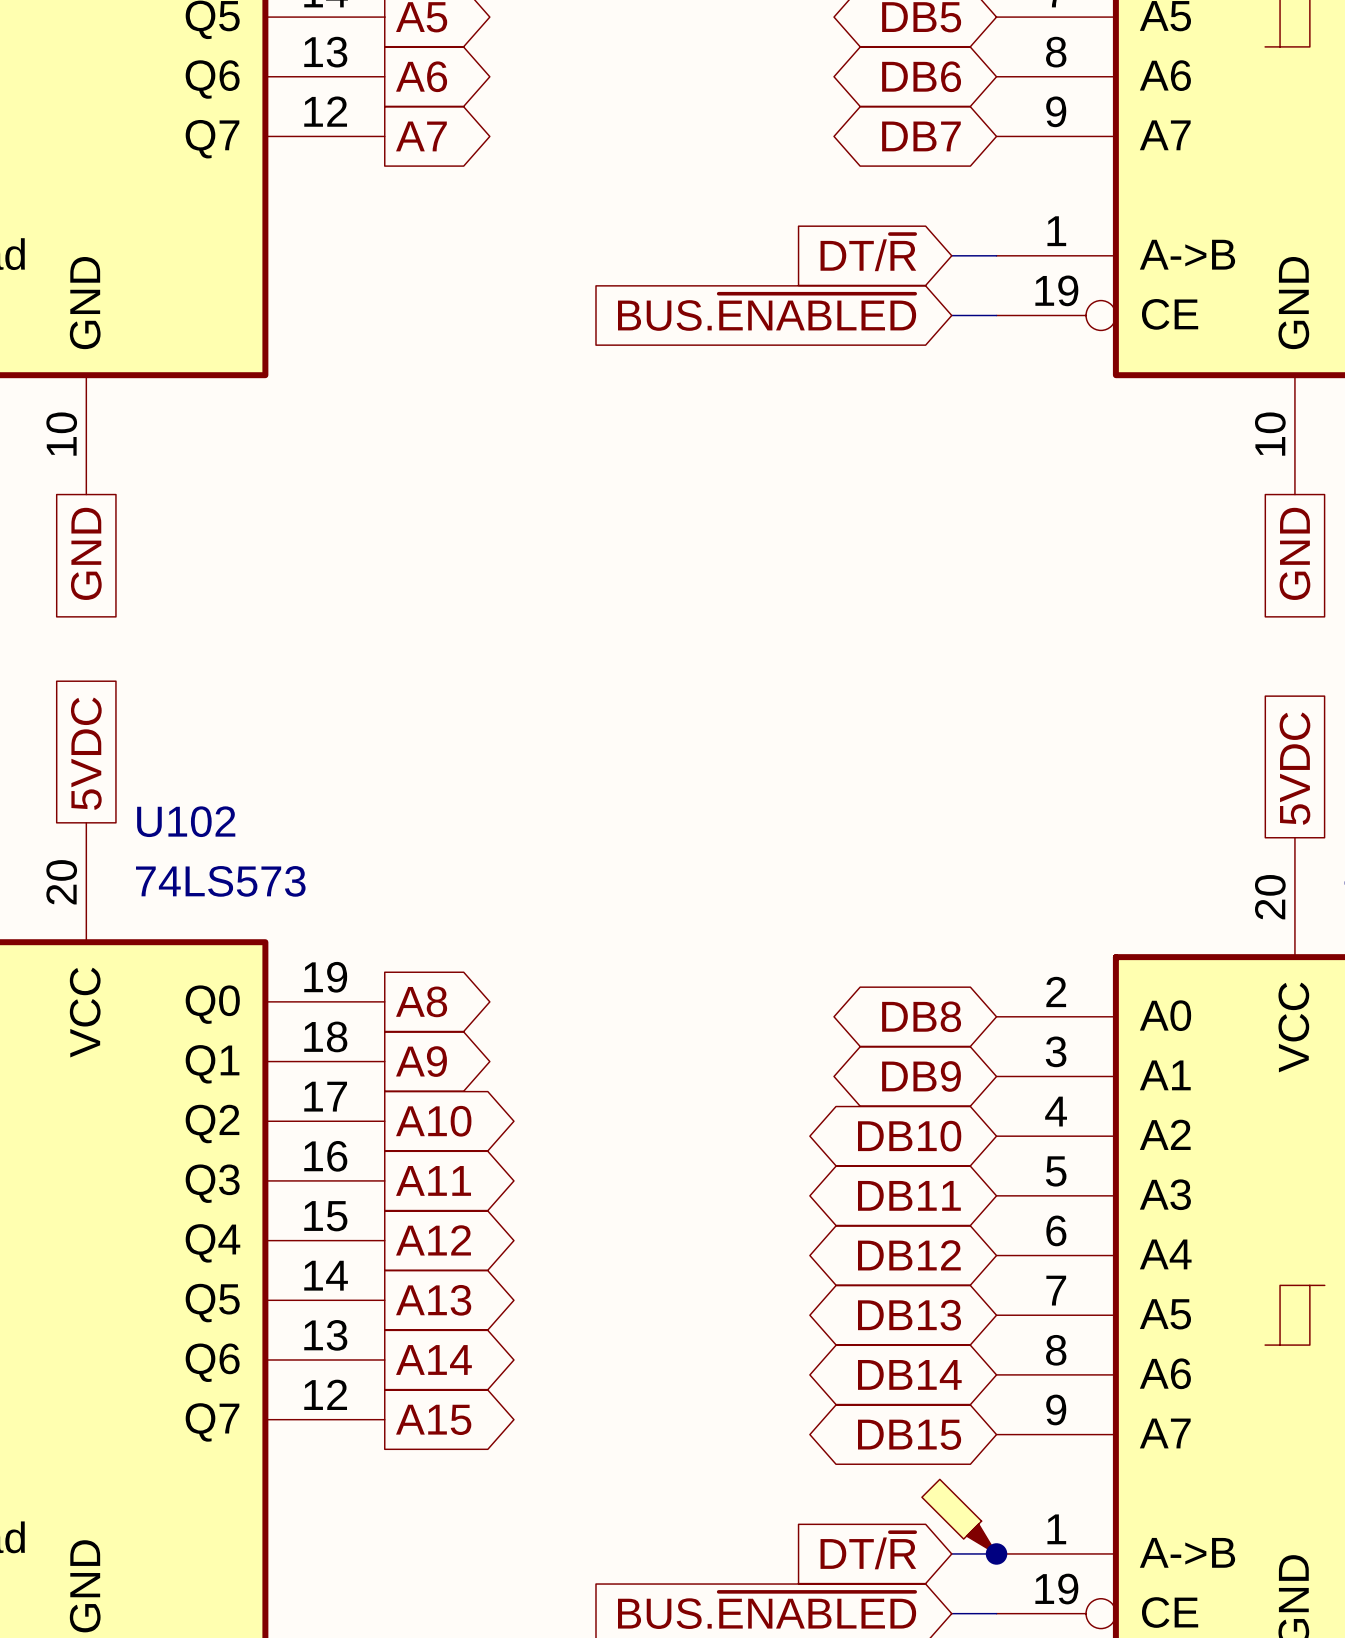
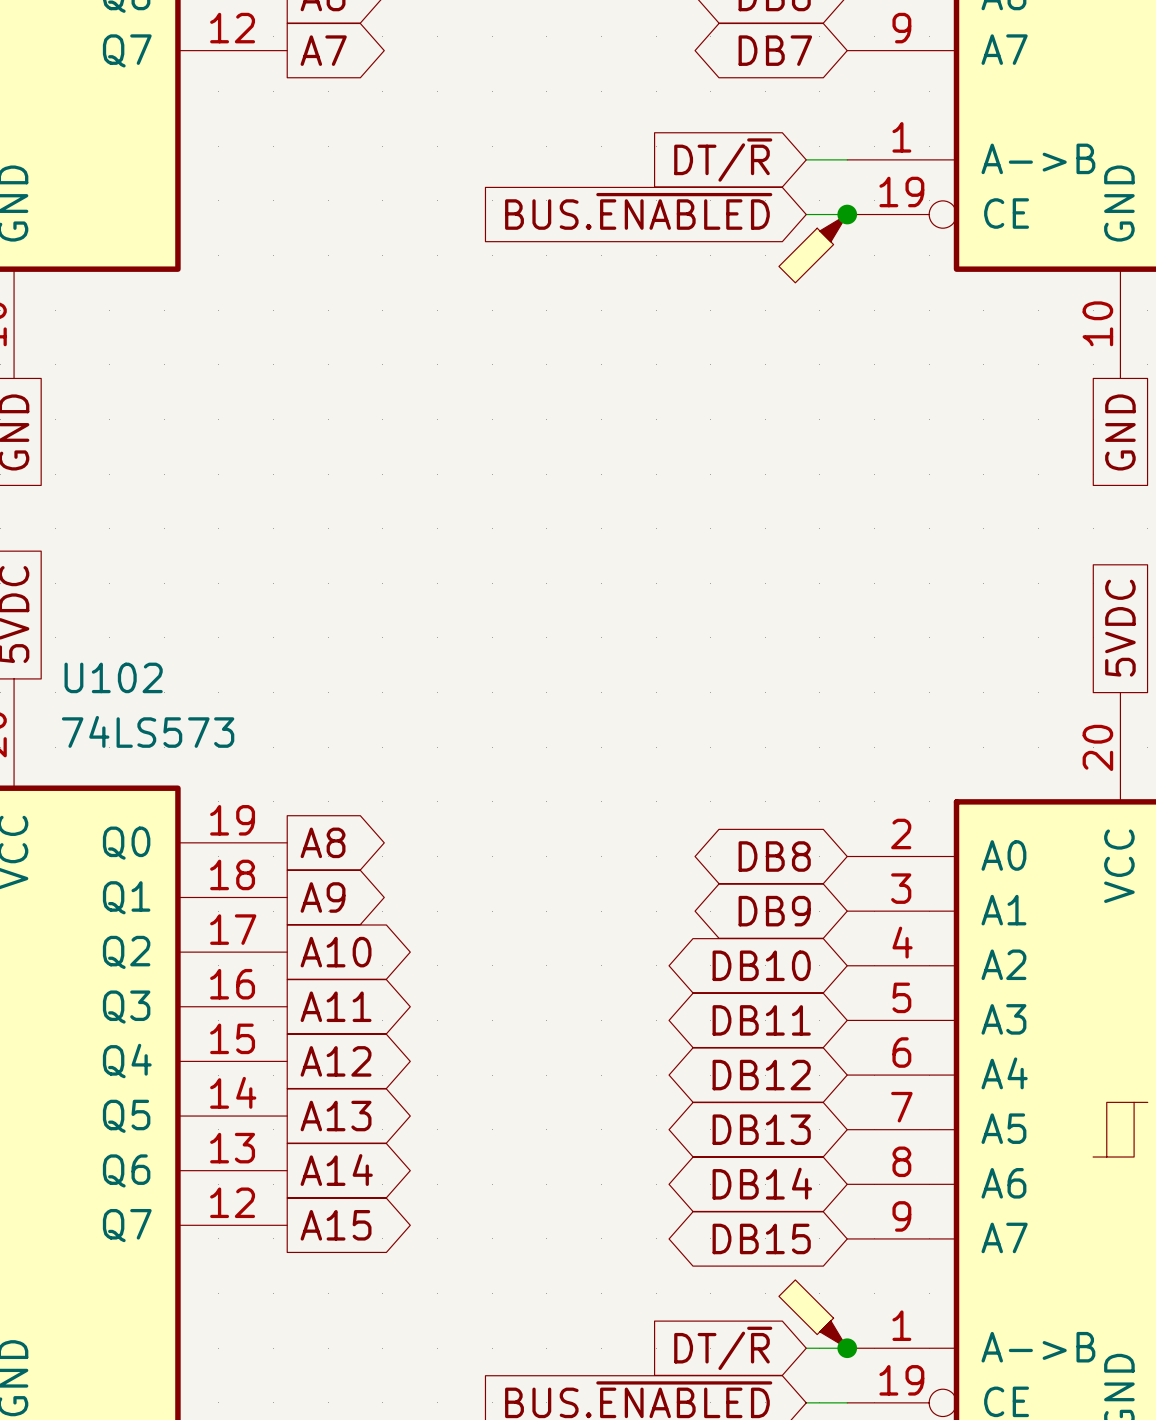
junction: none -> (847, 214)
part: none -> (813, 248)

